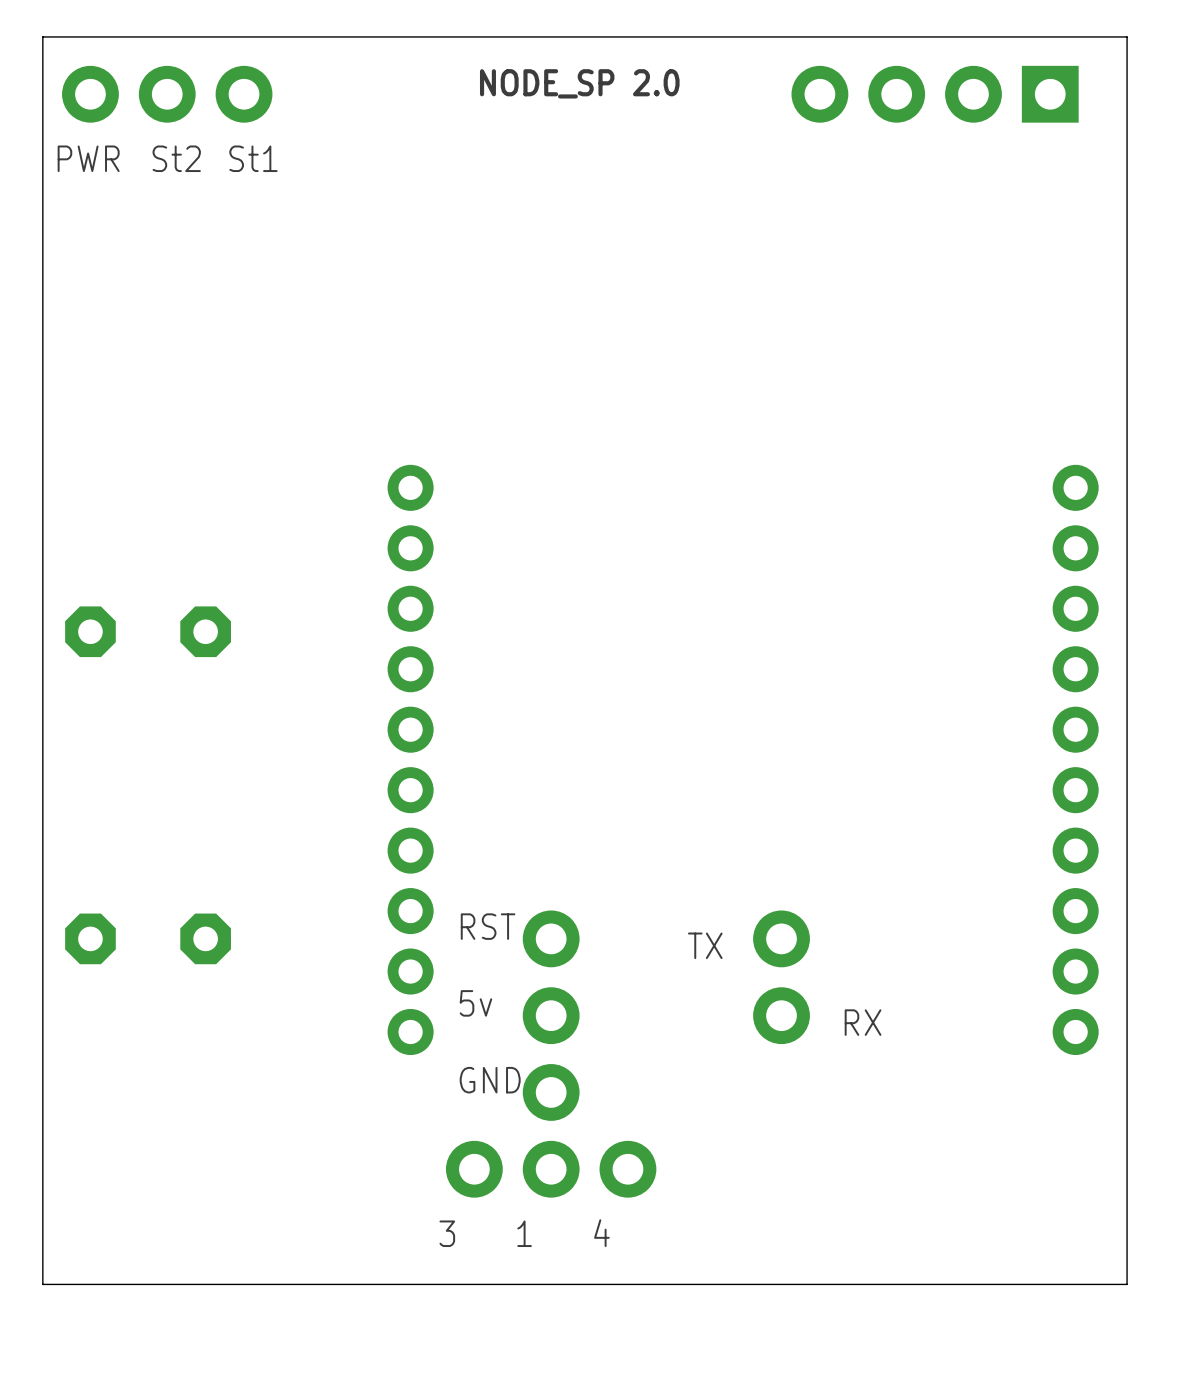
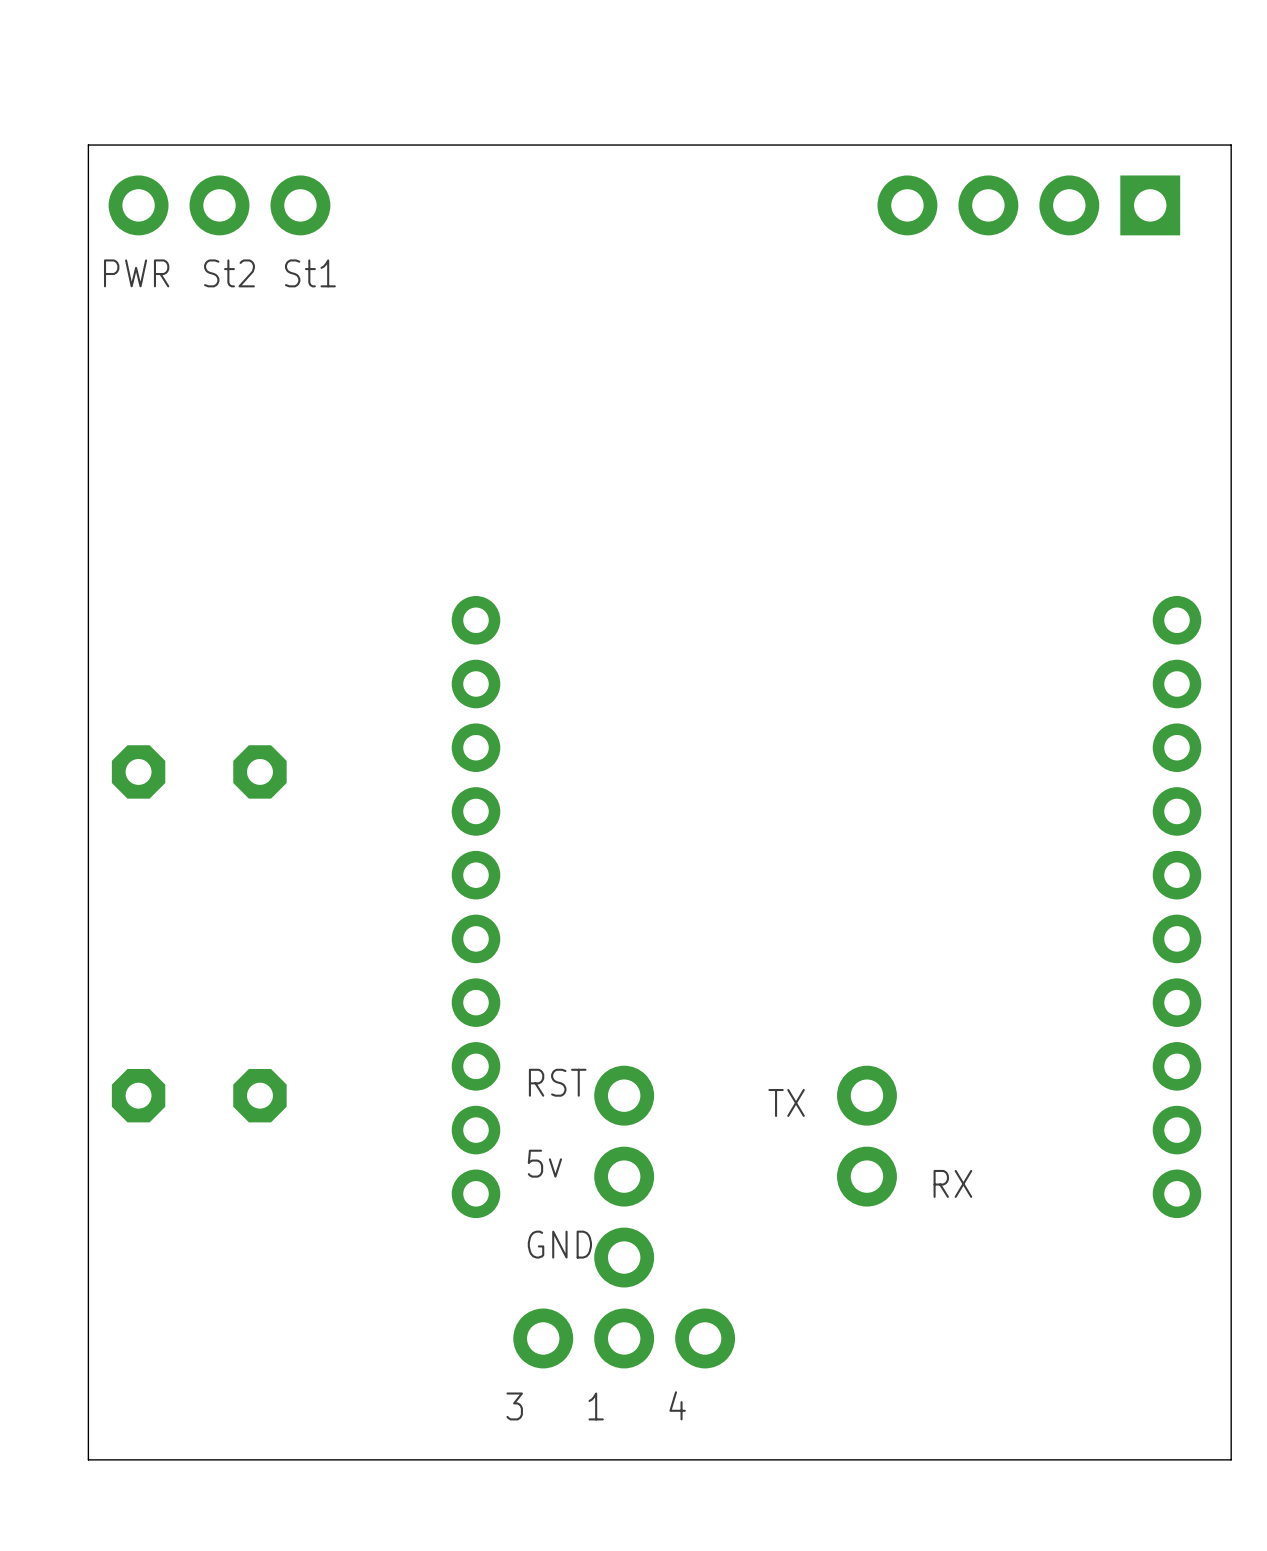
text: NODE_SP 2.0 (579, 83) -> none

